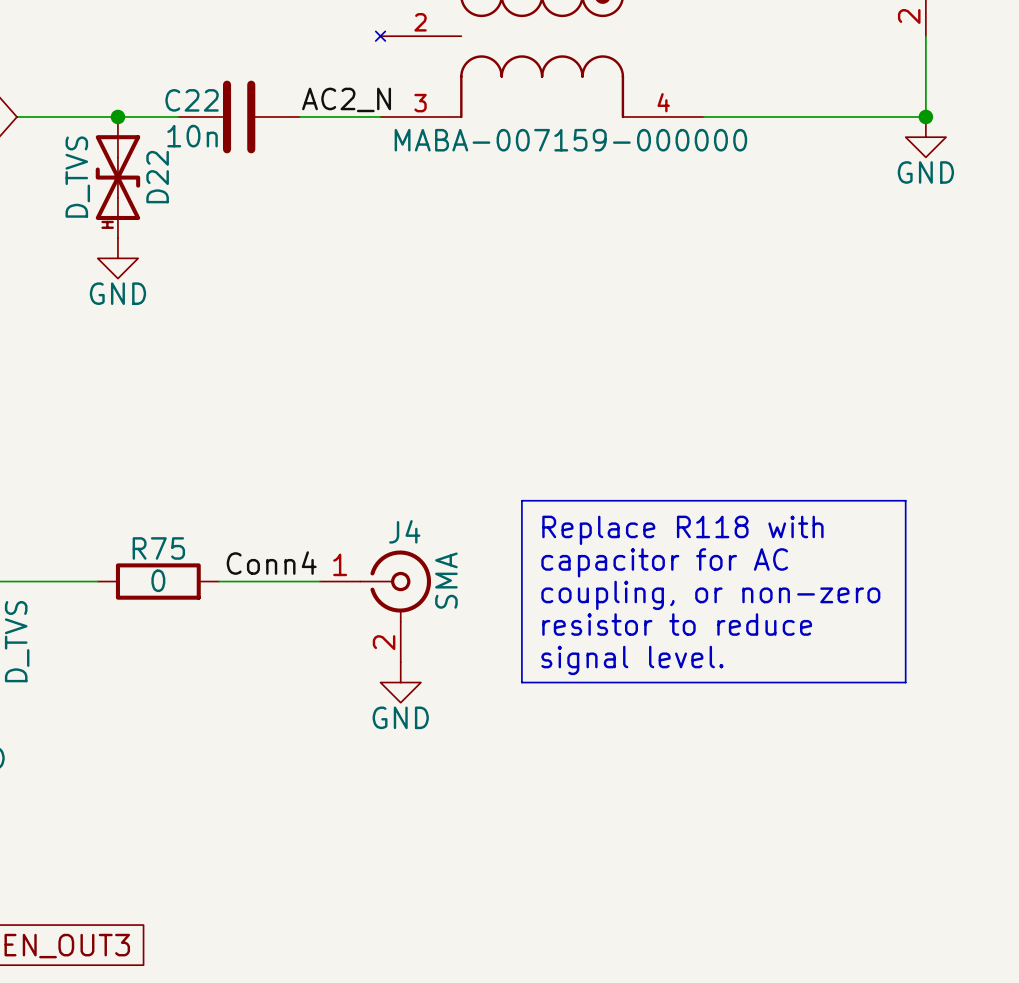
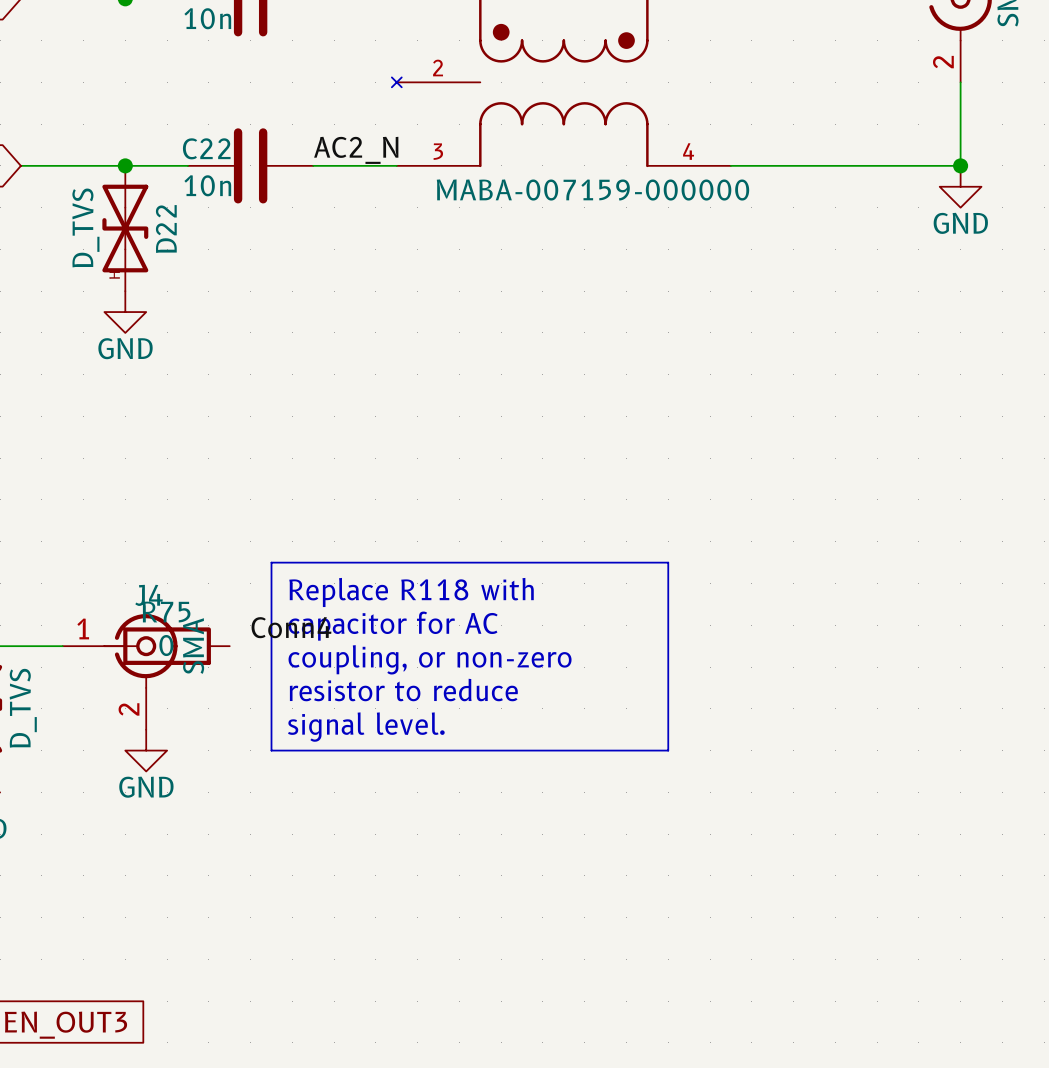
line: (521, 500) (521, 682) -> (542, 562) (271, 562) (271, 750) (542, 750)
line: (643, 500) (905, 500) (905, 682) (643, 682) -> (668, 562) (668, 750)
text position: Replace R118 with (682, 530) -> Replace R118 with (411, 592)
text position: capacitor for AC (664, 562) -> capacitor for AC (393, 626)
wire: (218, 581) (319, 581) -> none
text position: coupling, or non-zero (710, 595) -> coupling, or non-zero (430, 659)
J4 position: (375, 606) -> (120, 671)
text position: resistor to reduce (677, 624) -> resistor to reduce (403, 690)
text position: signal level. (632, 660) -> signal level. (366, 727)
power symbol position: GND (400, 682) -> GND (146, 750)

